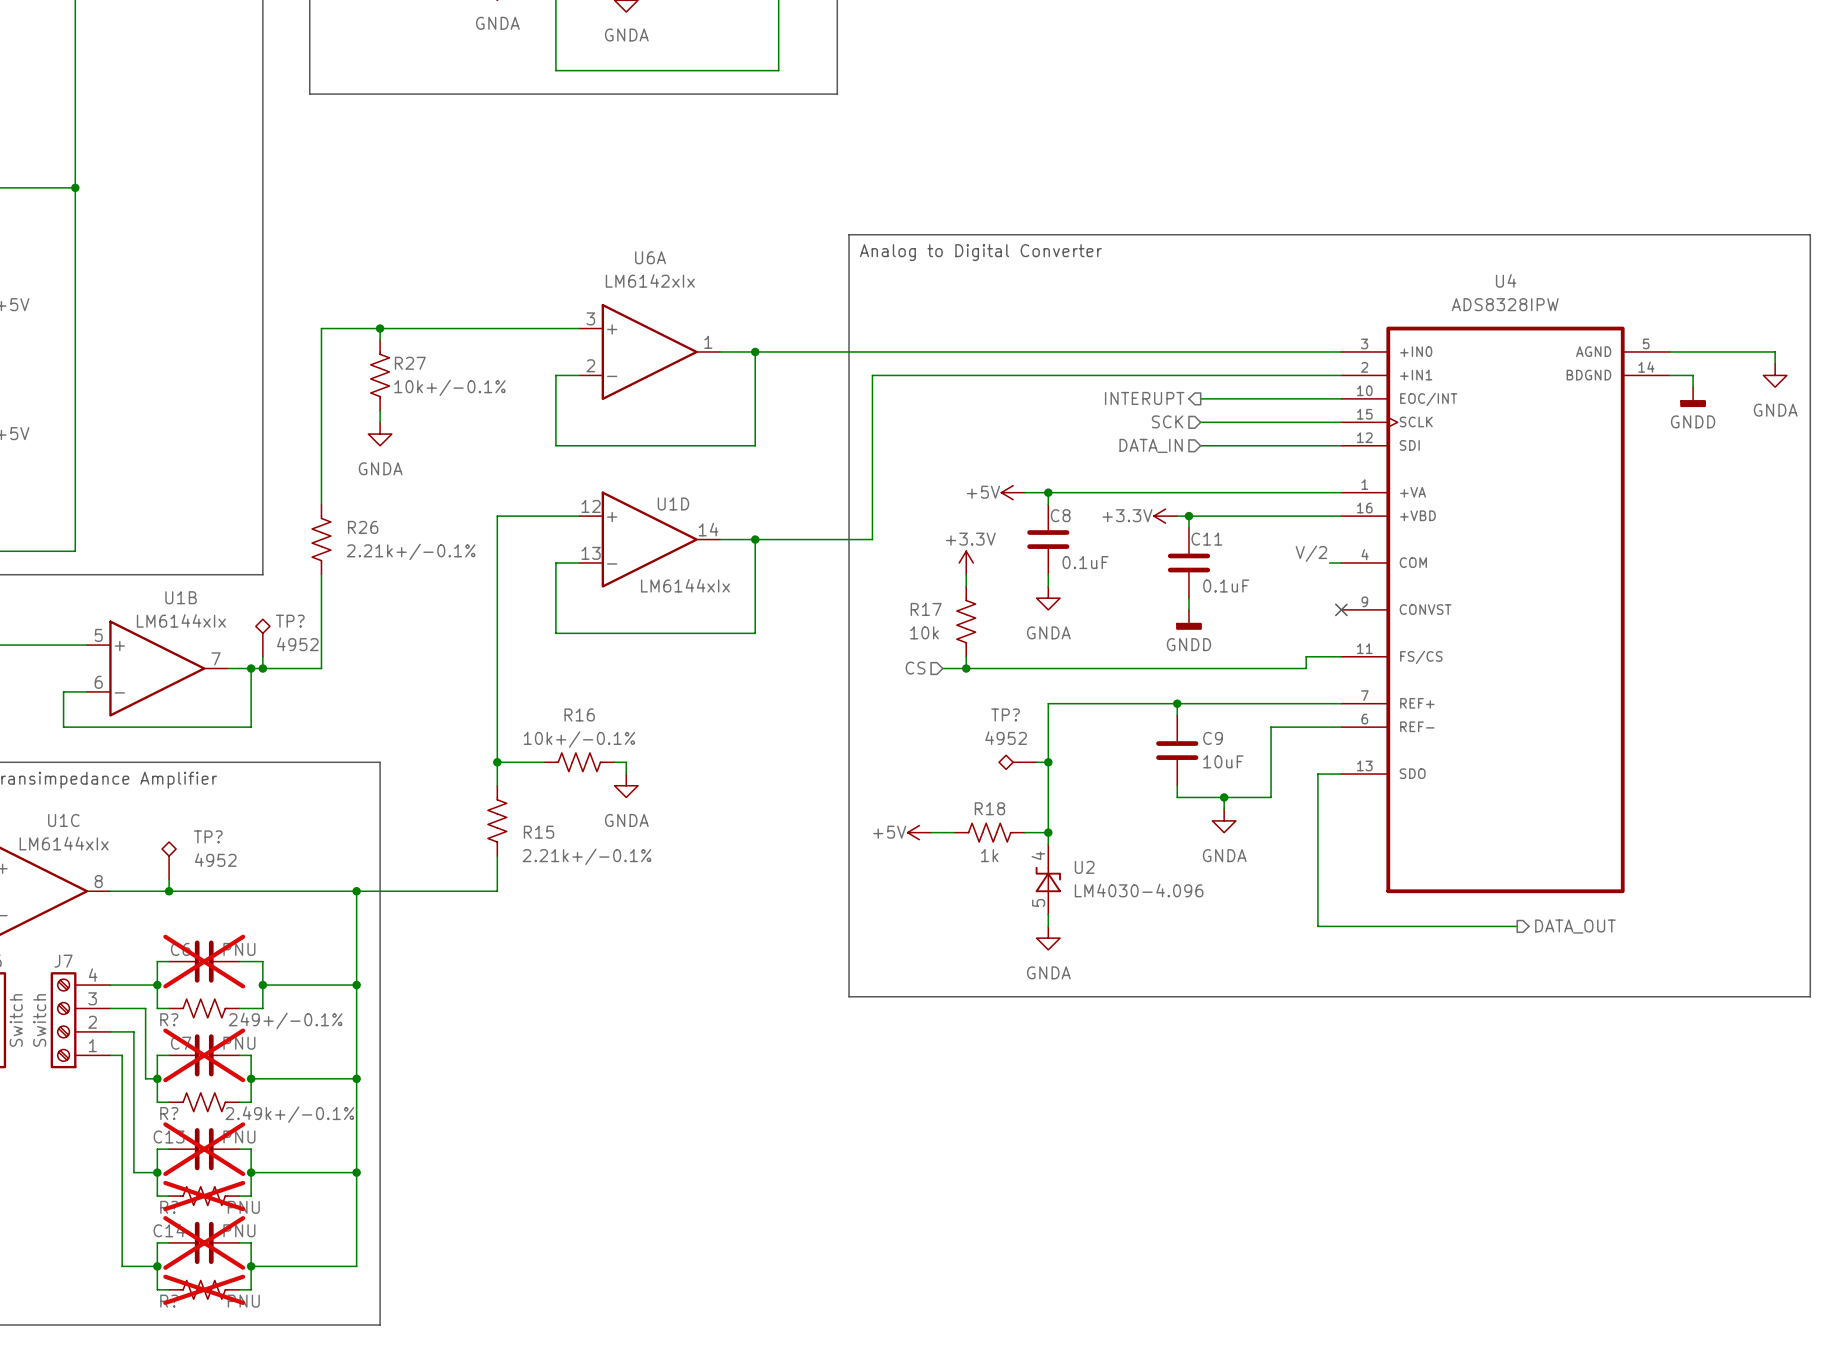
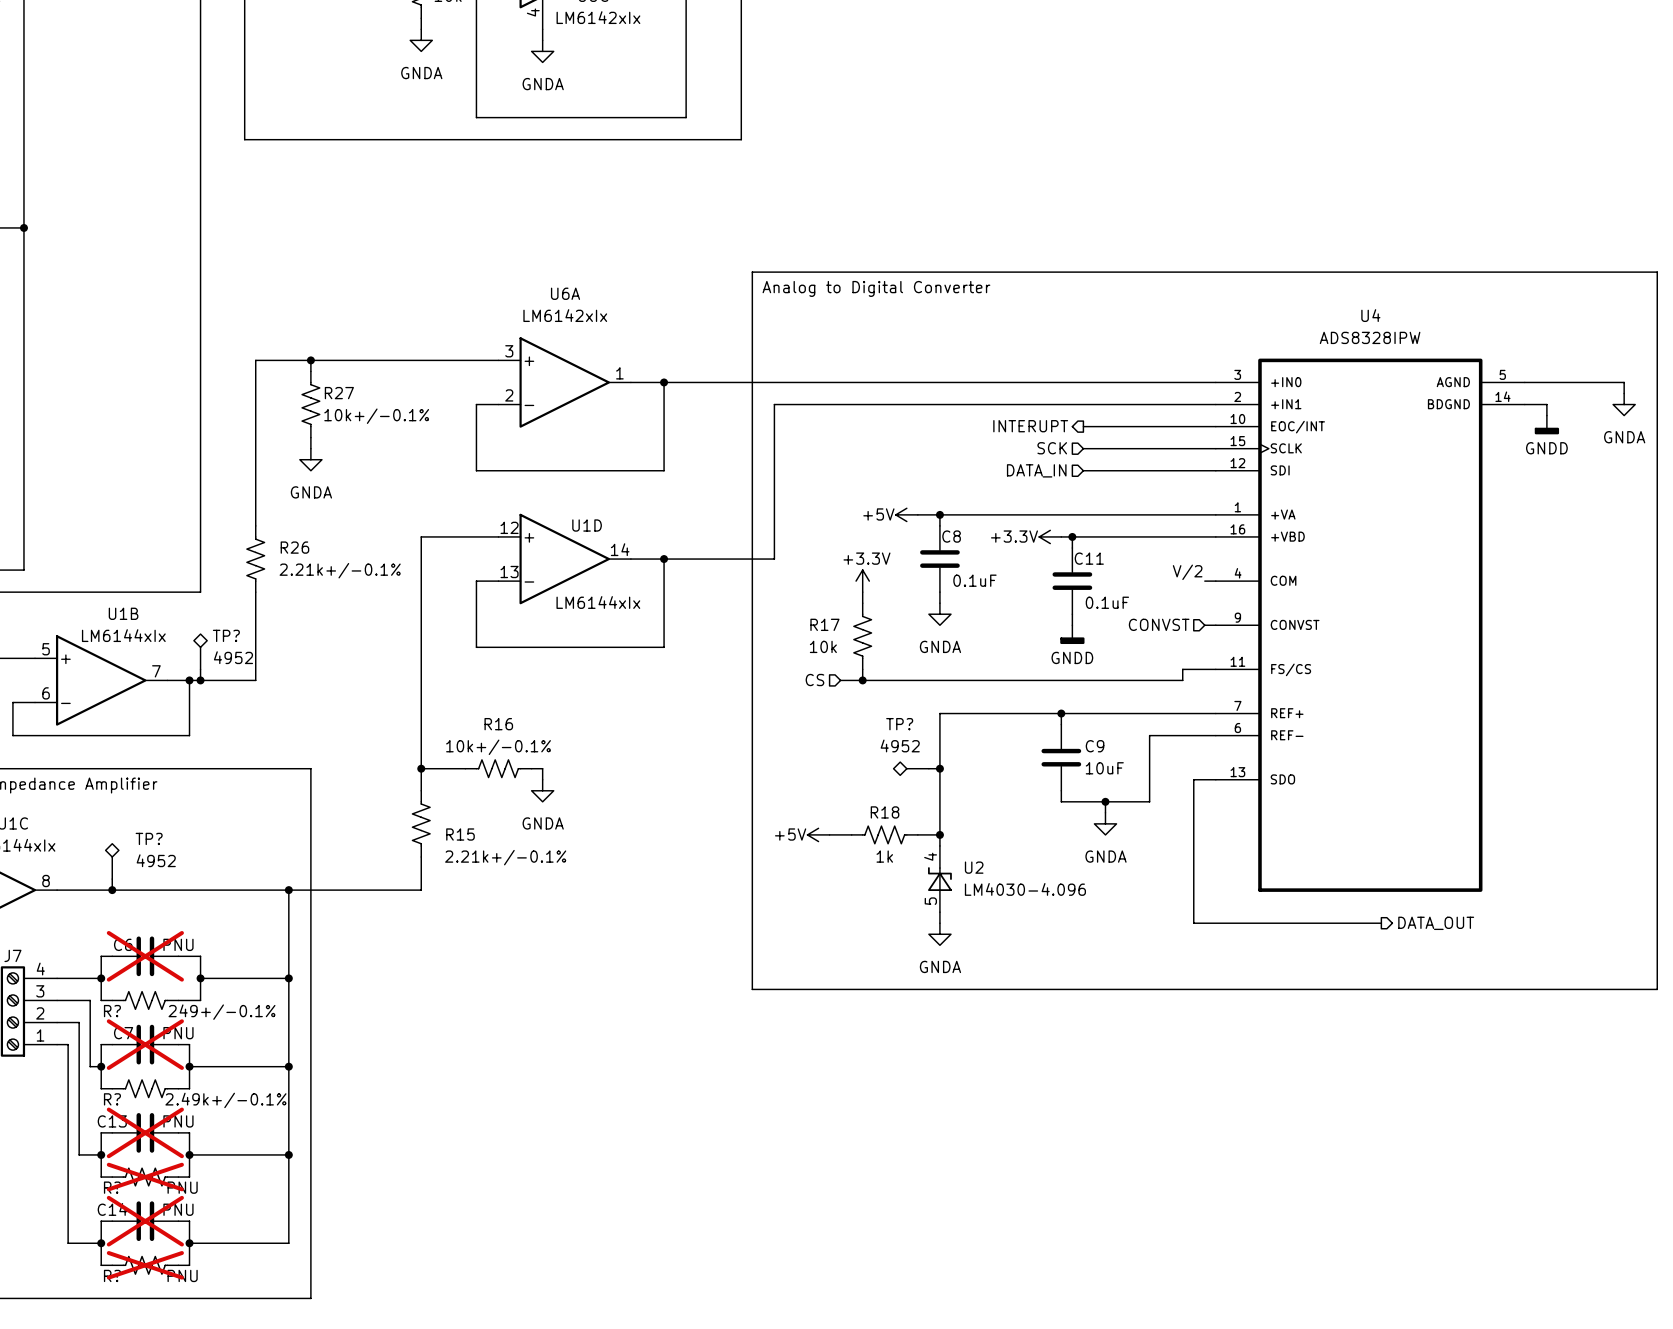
hierarchical label: none -> CONVST (1159, 624)
wire: none -> (1204, 625) (1215, 625)
no-connect mark: (1341, 609) -> none

